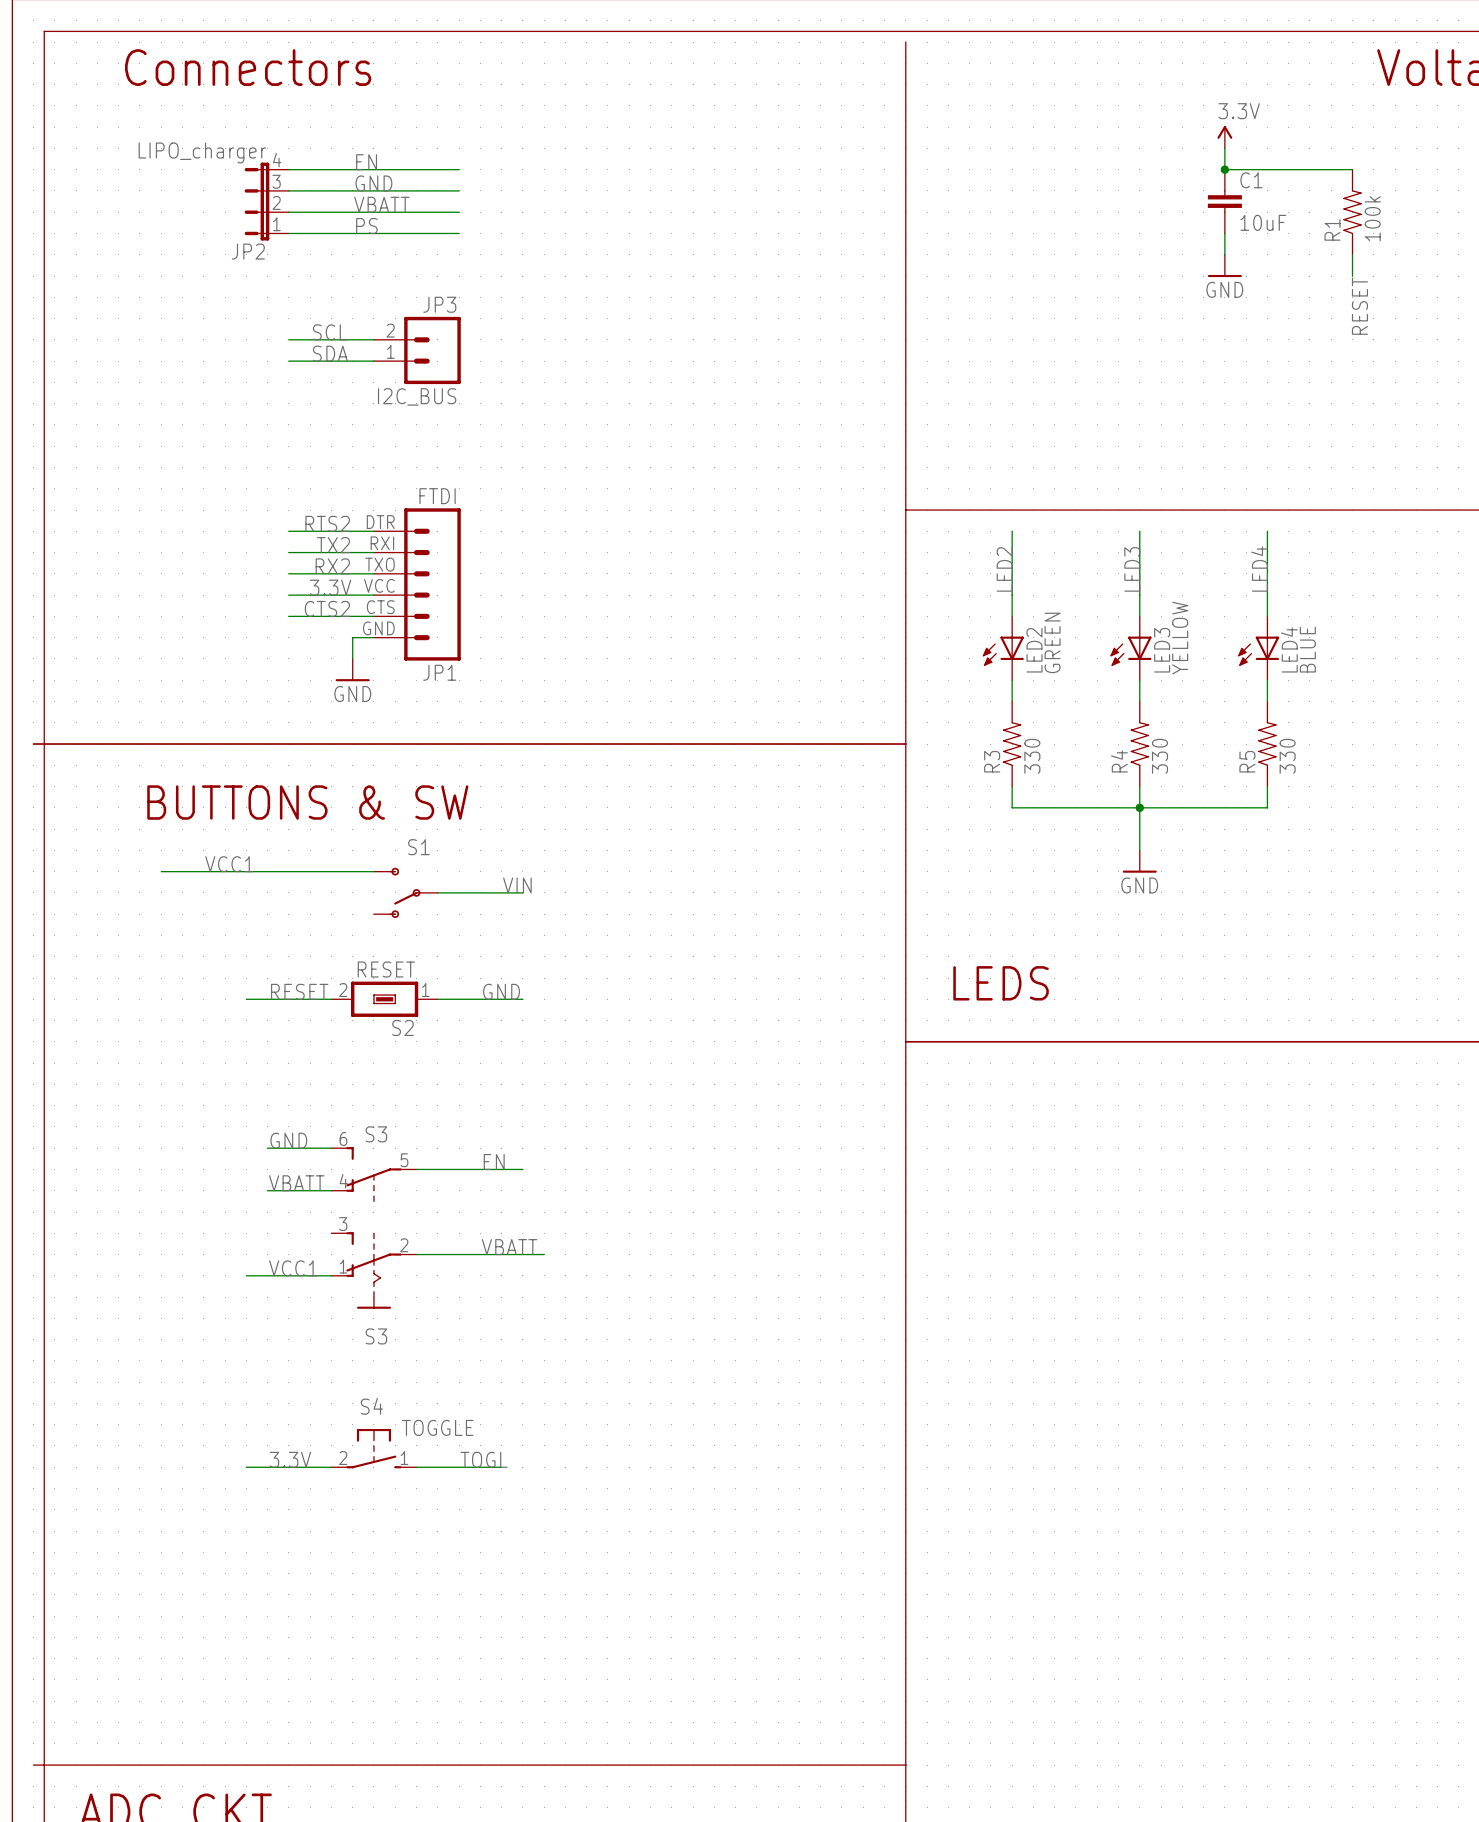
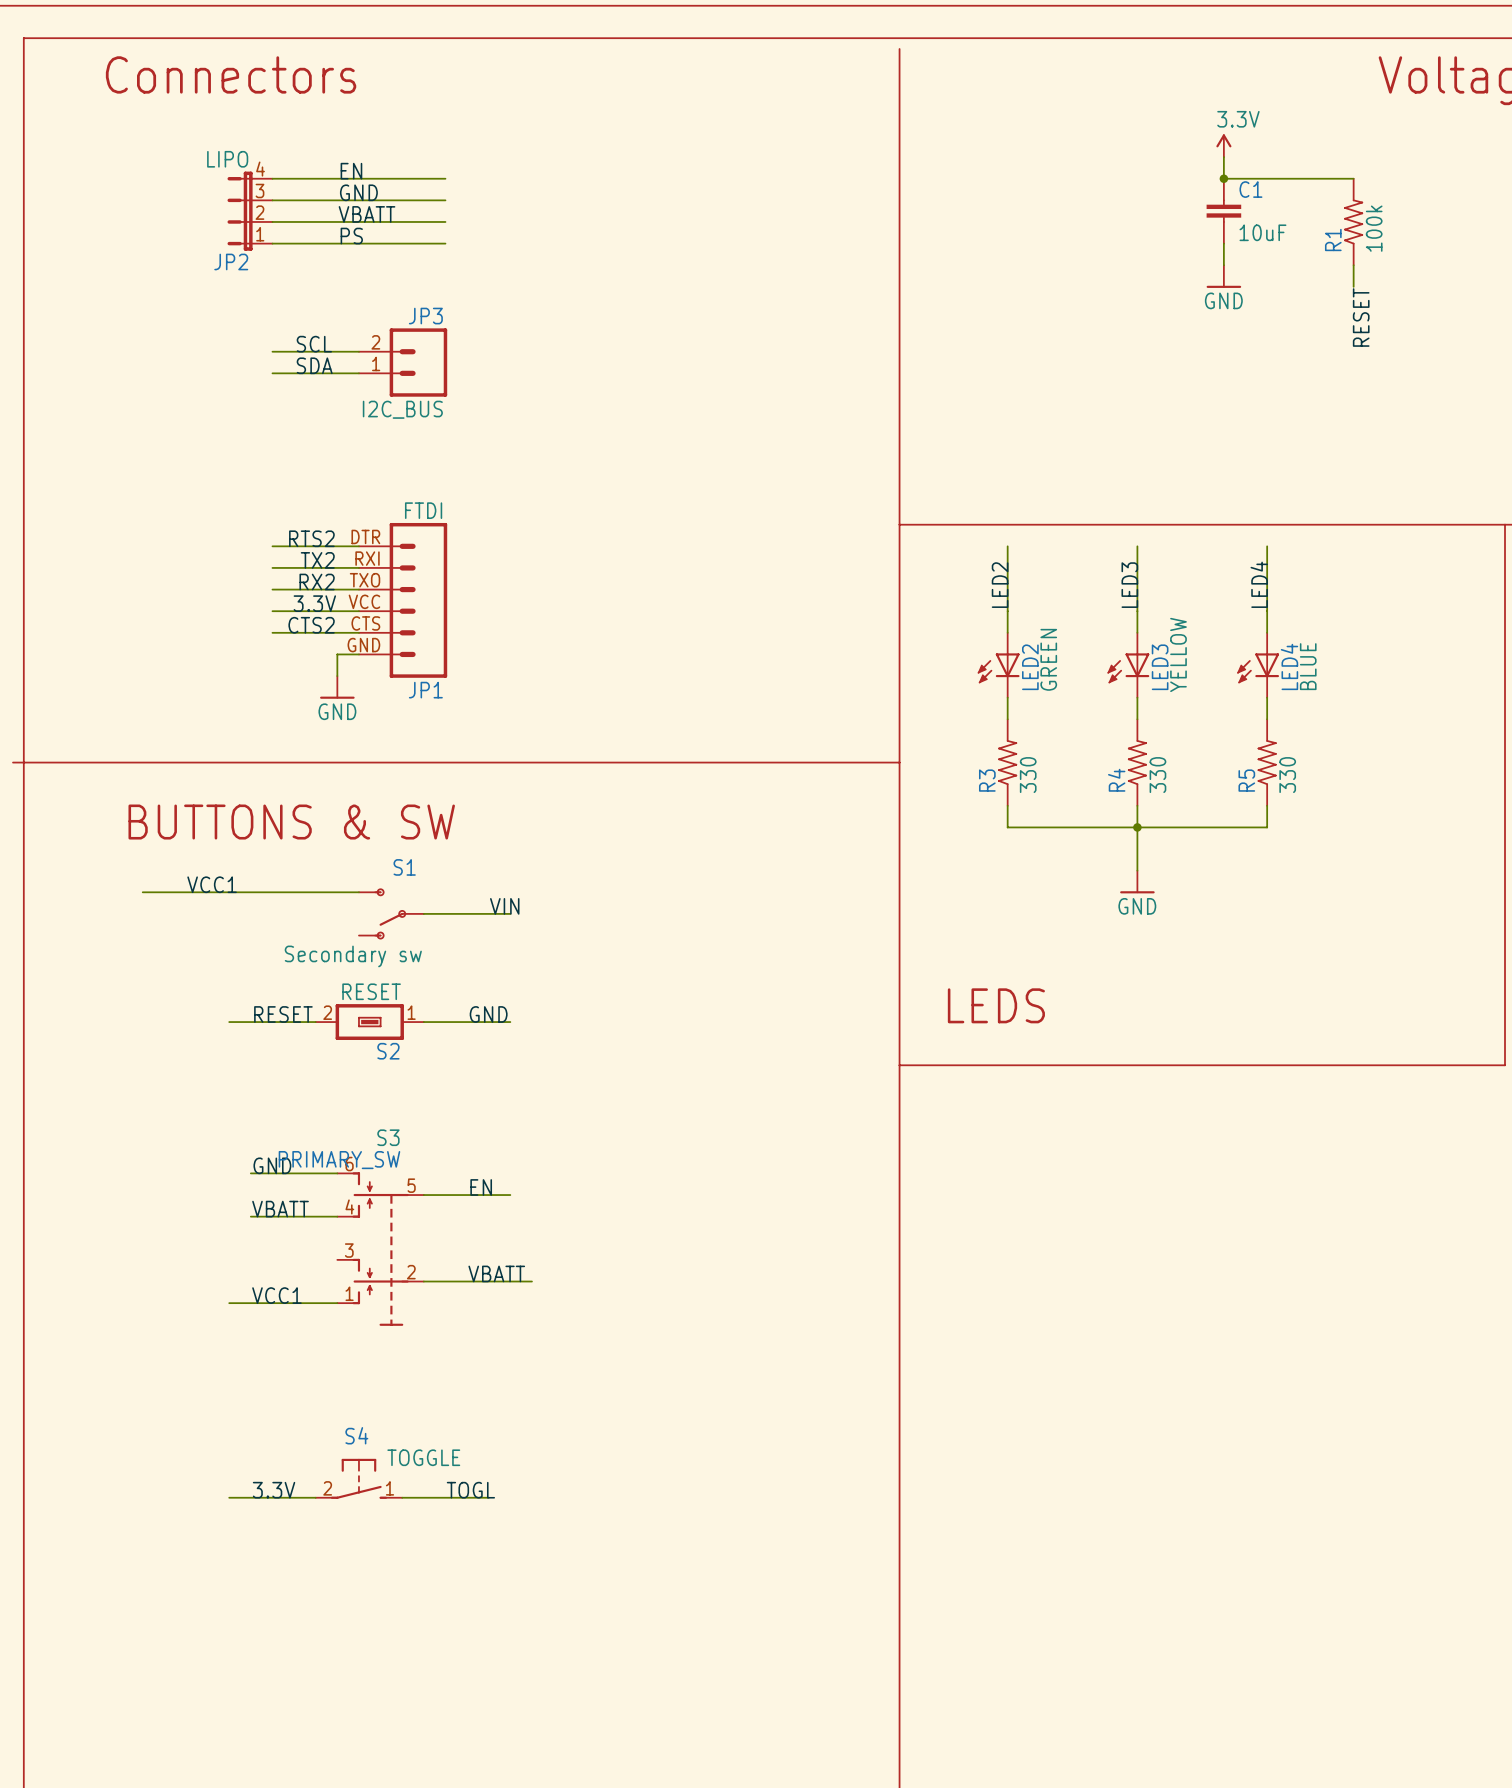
JP2 value: LIPO_charger (202, 152) -> LIPO (227, 159)
S1 value: none -> Secondary sw (353, 956)
S3: (373, 1174) -> none
PRIMARY_SW: none -> S3 (380, 1249)
S3: (373, 1270) -> none

